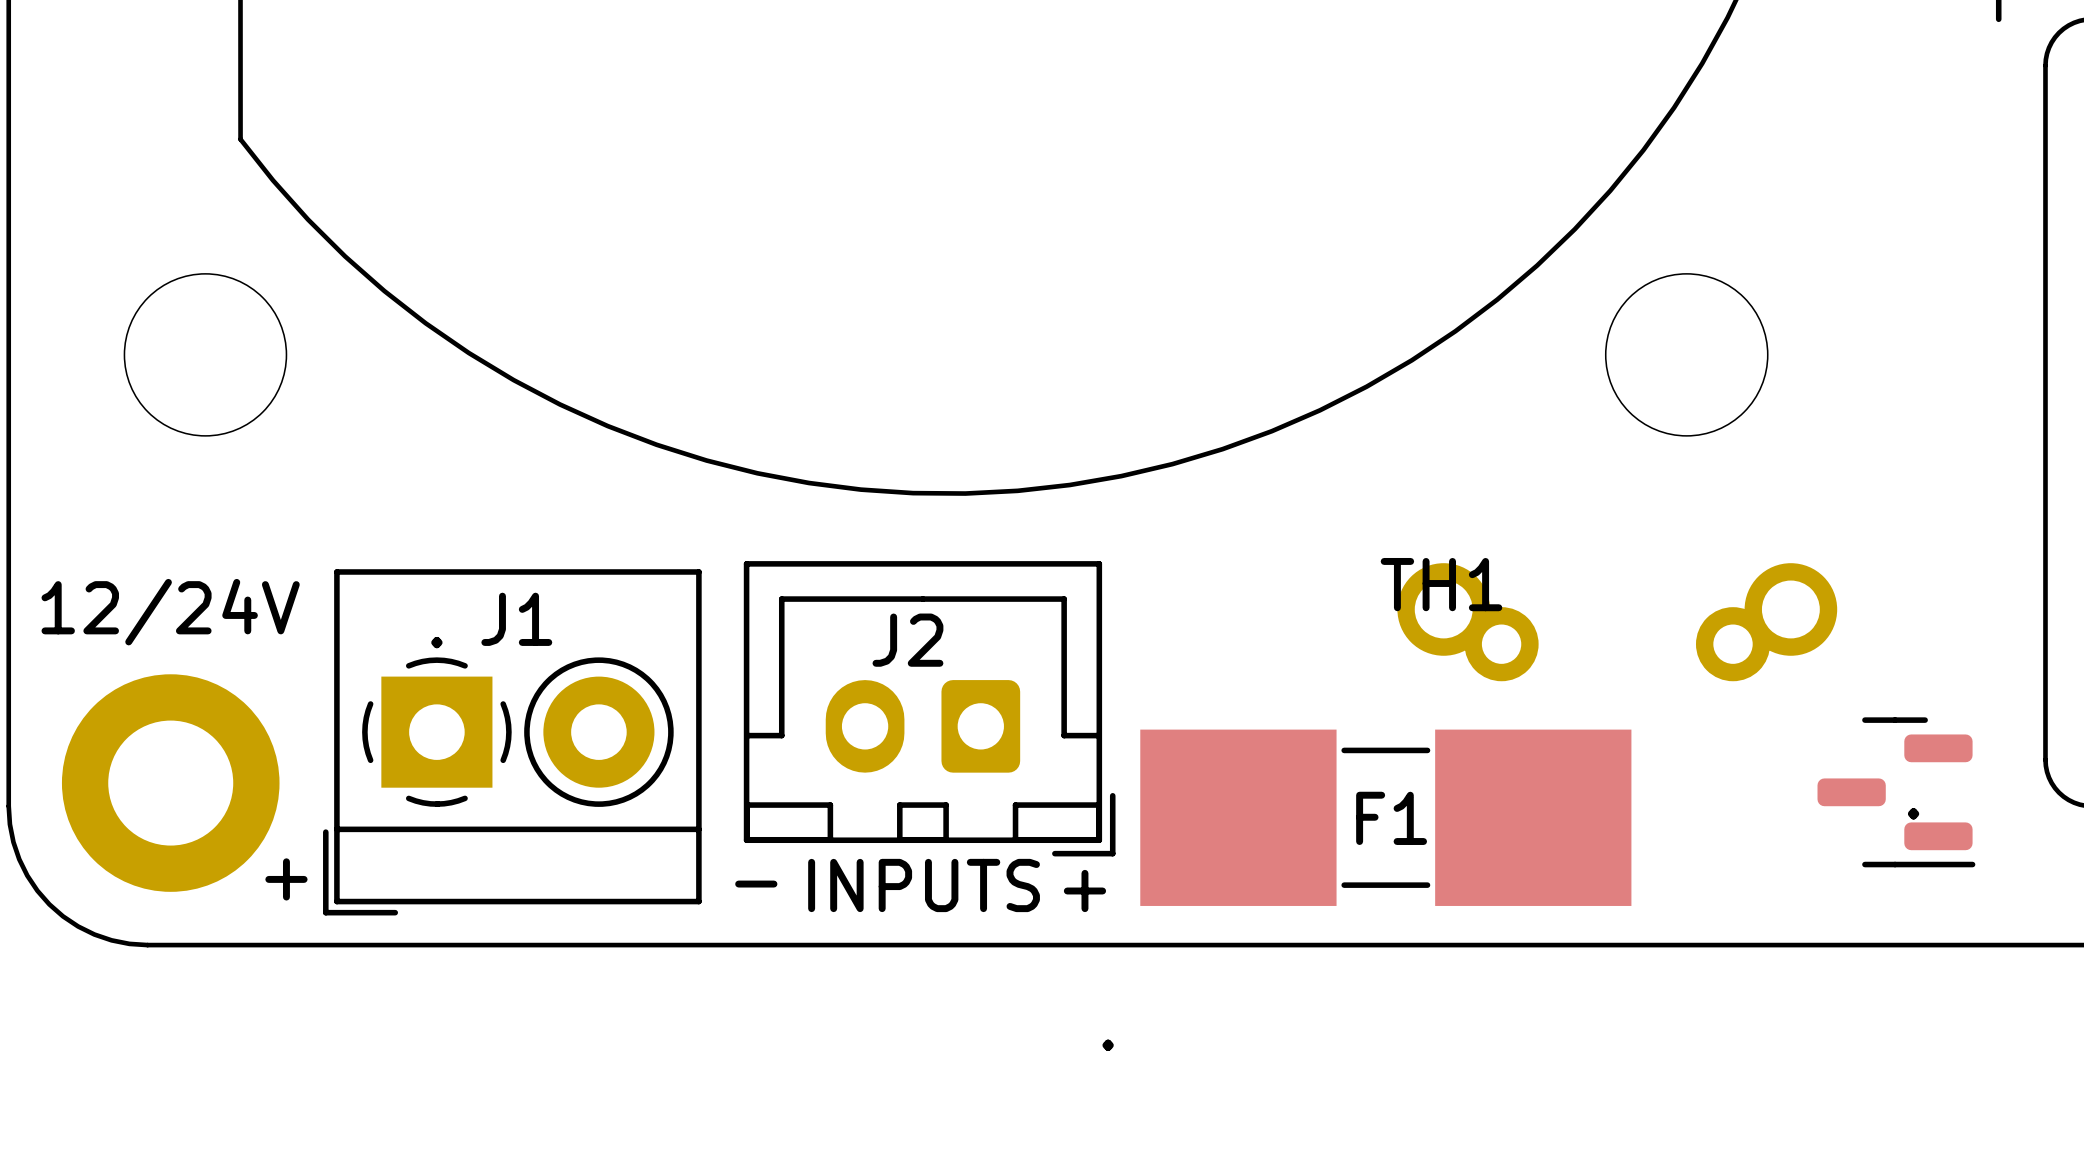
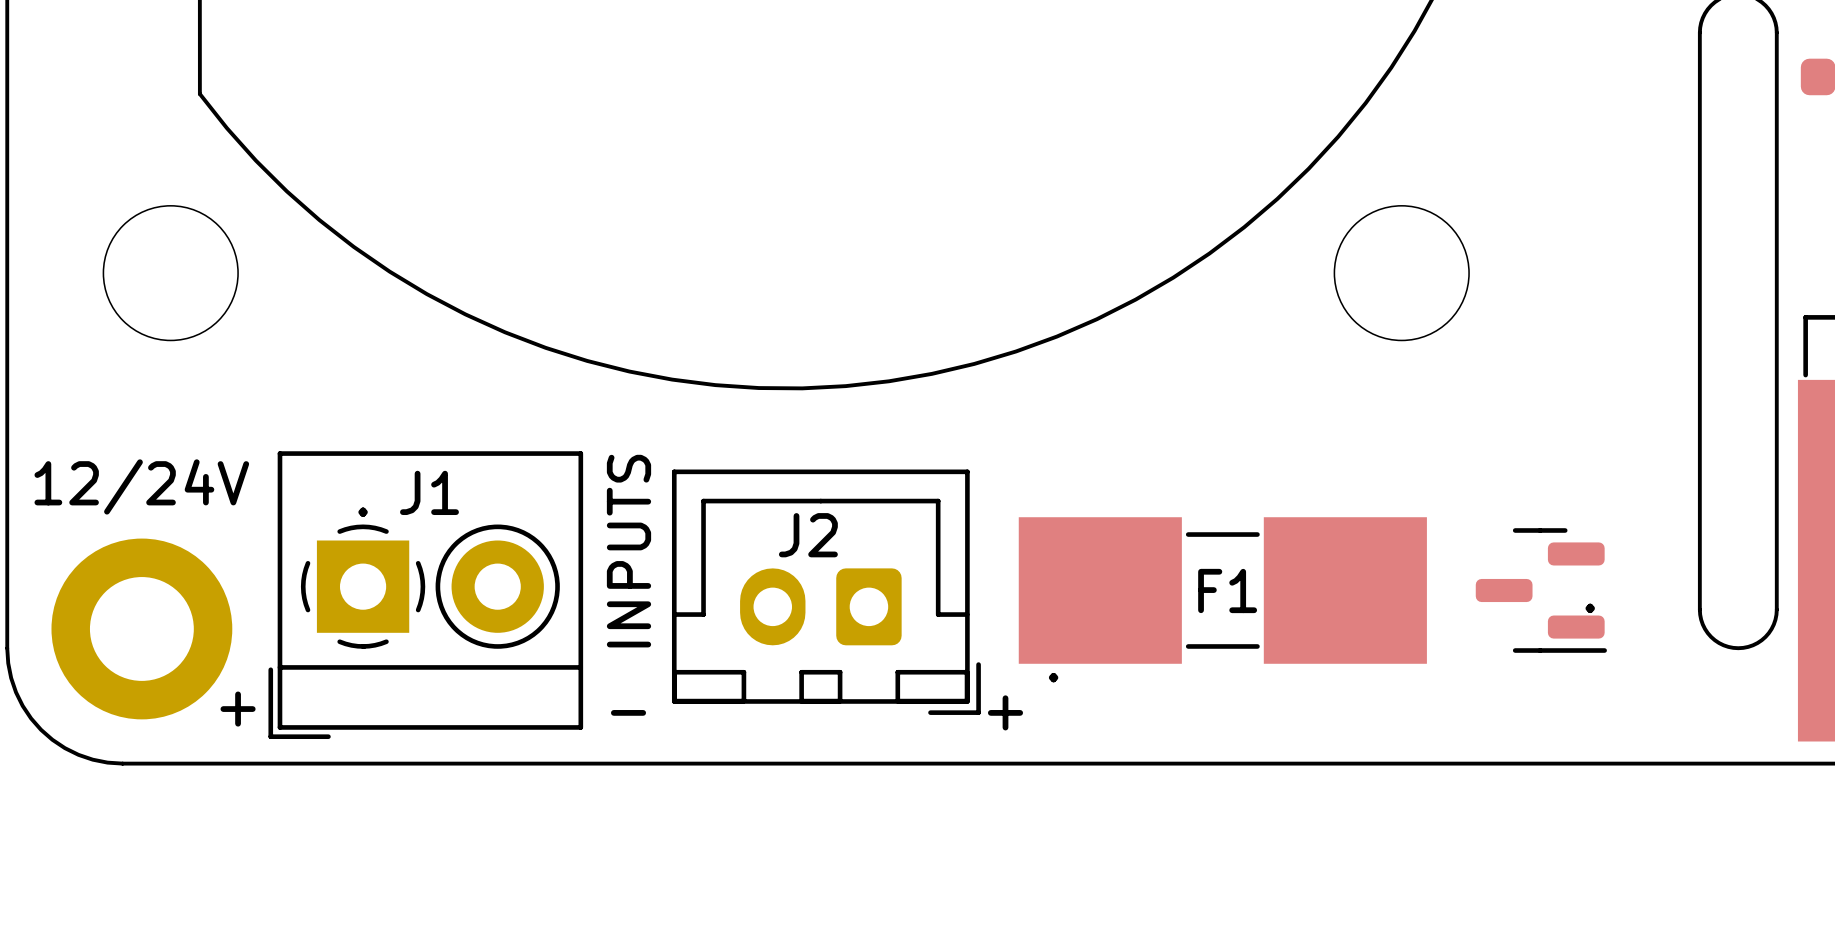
TH1: (1617, 622) -> none
J2 position: (929, 708) -> (826, 592)
part position: (1896, 792) -> (1541, 590)
text position: . (1913, 813) -> . (1590, 608)
F1 position: (1385, 817) -> (1222, 590)
text rotation: 0° (924, 885) -> 90° counterclockwise (628, 551)
text position: + (1084, 890) -> + (1005, 712)
text position: . (1108, 1045) -> . (1053, 677)

